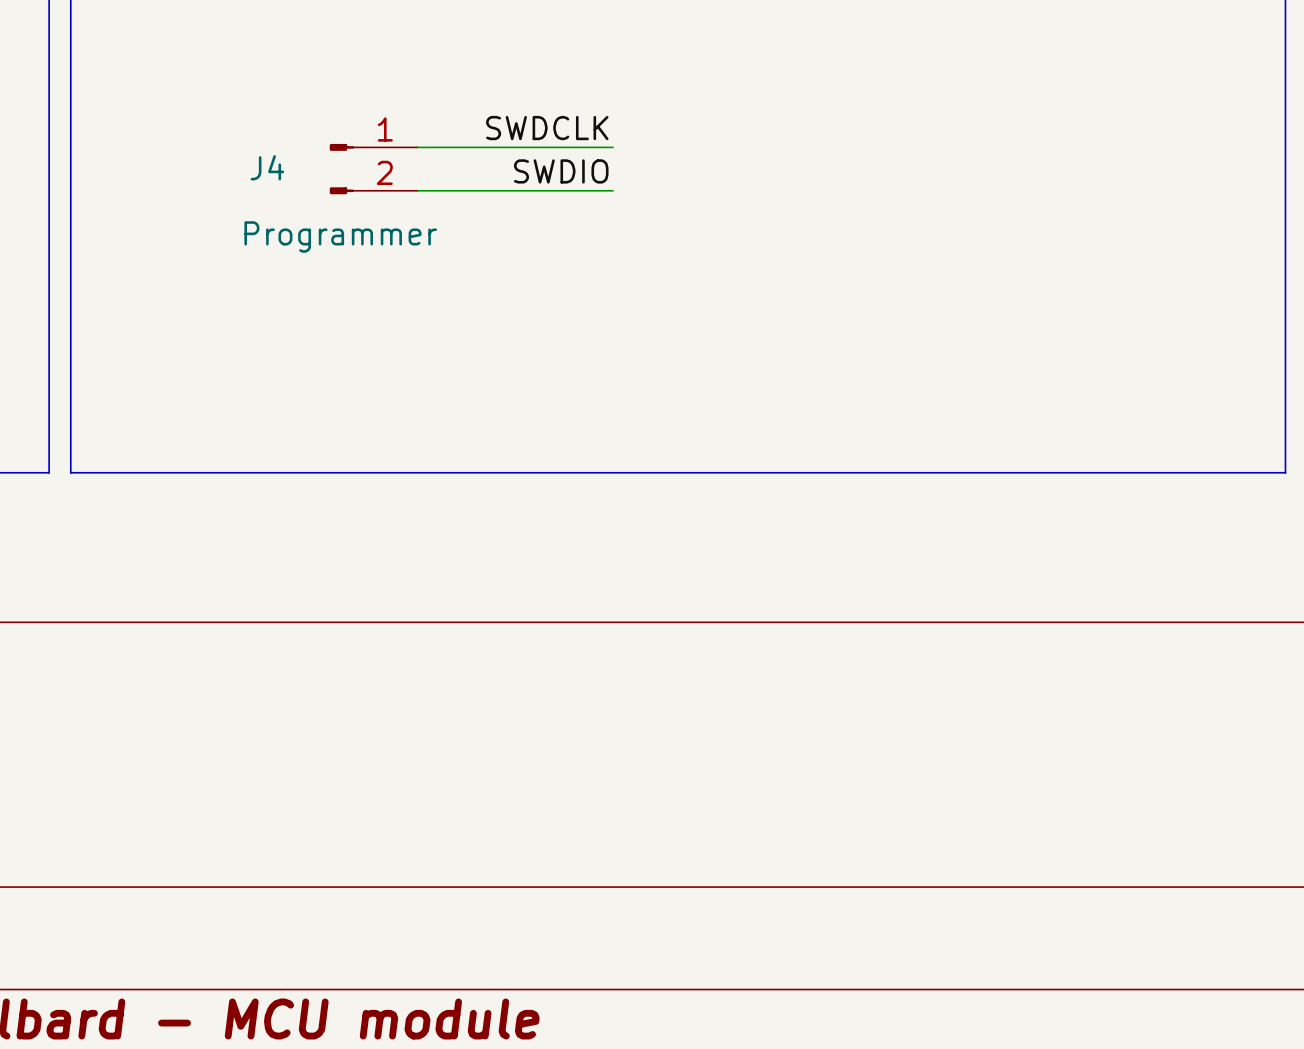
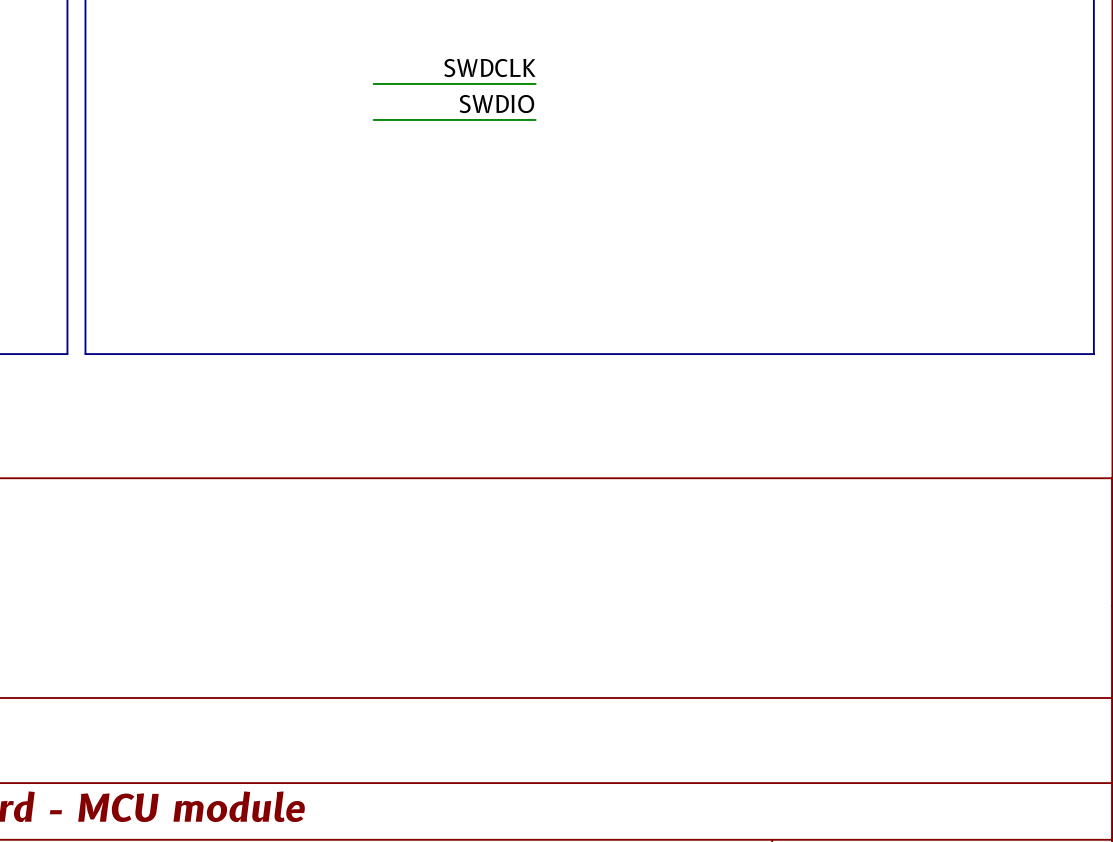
J4: Programmer (373, 169) -> none

